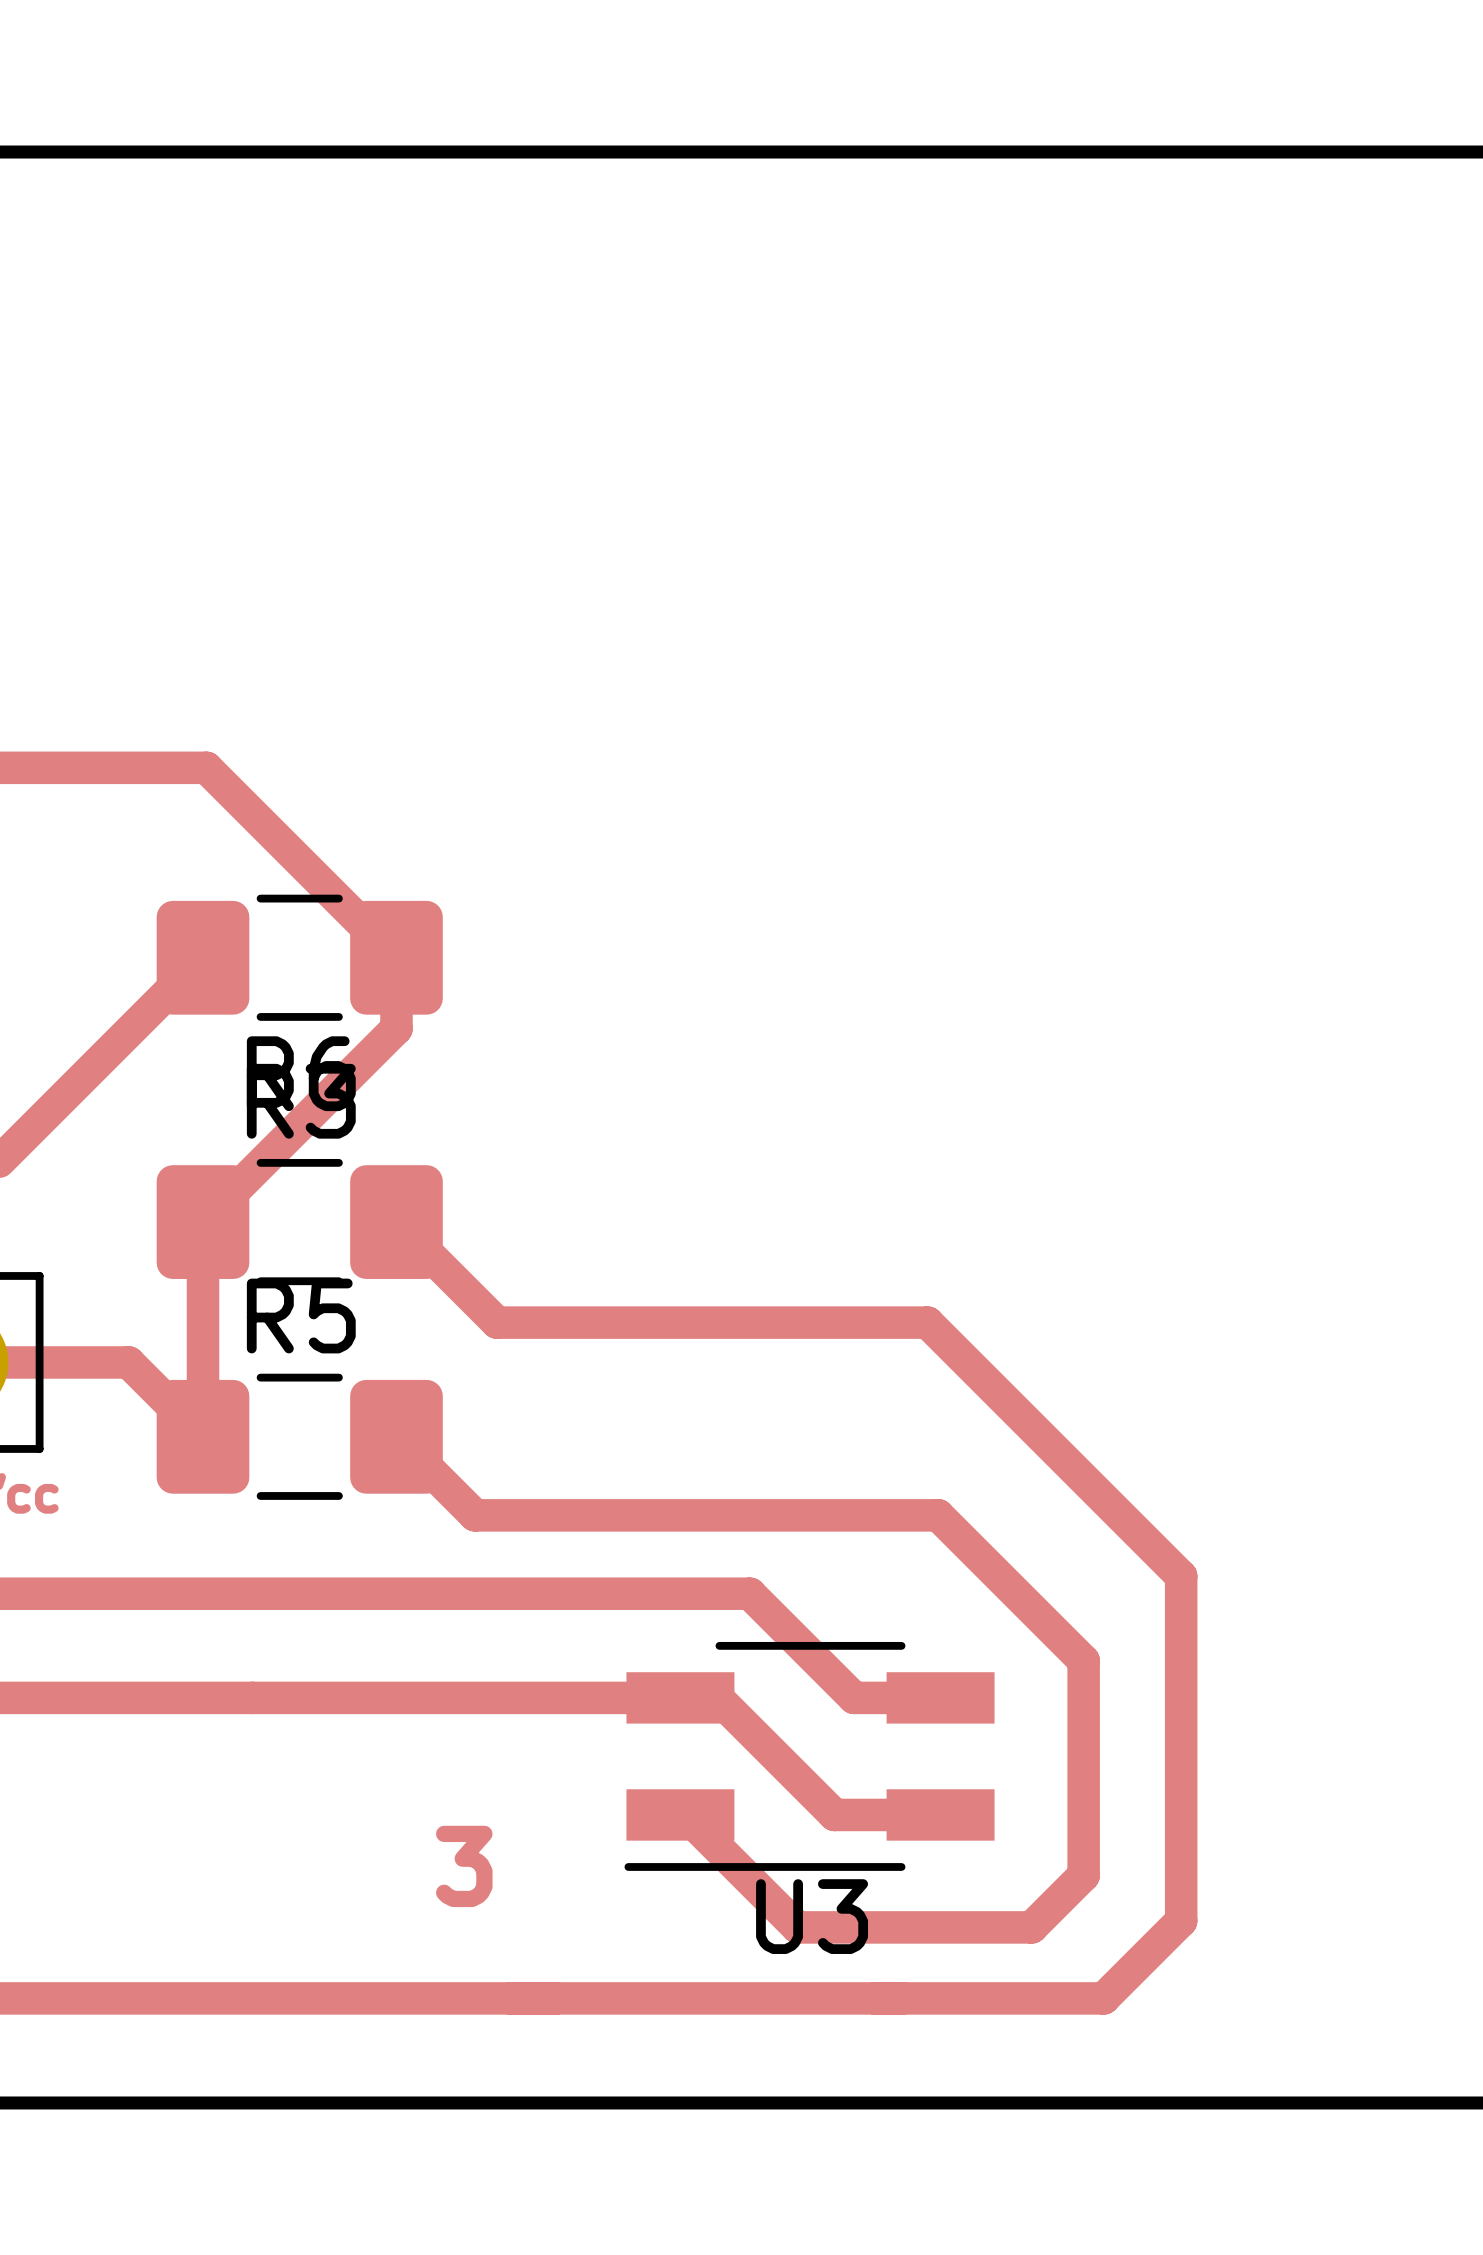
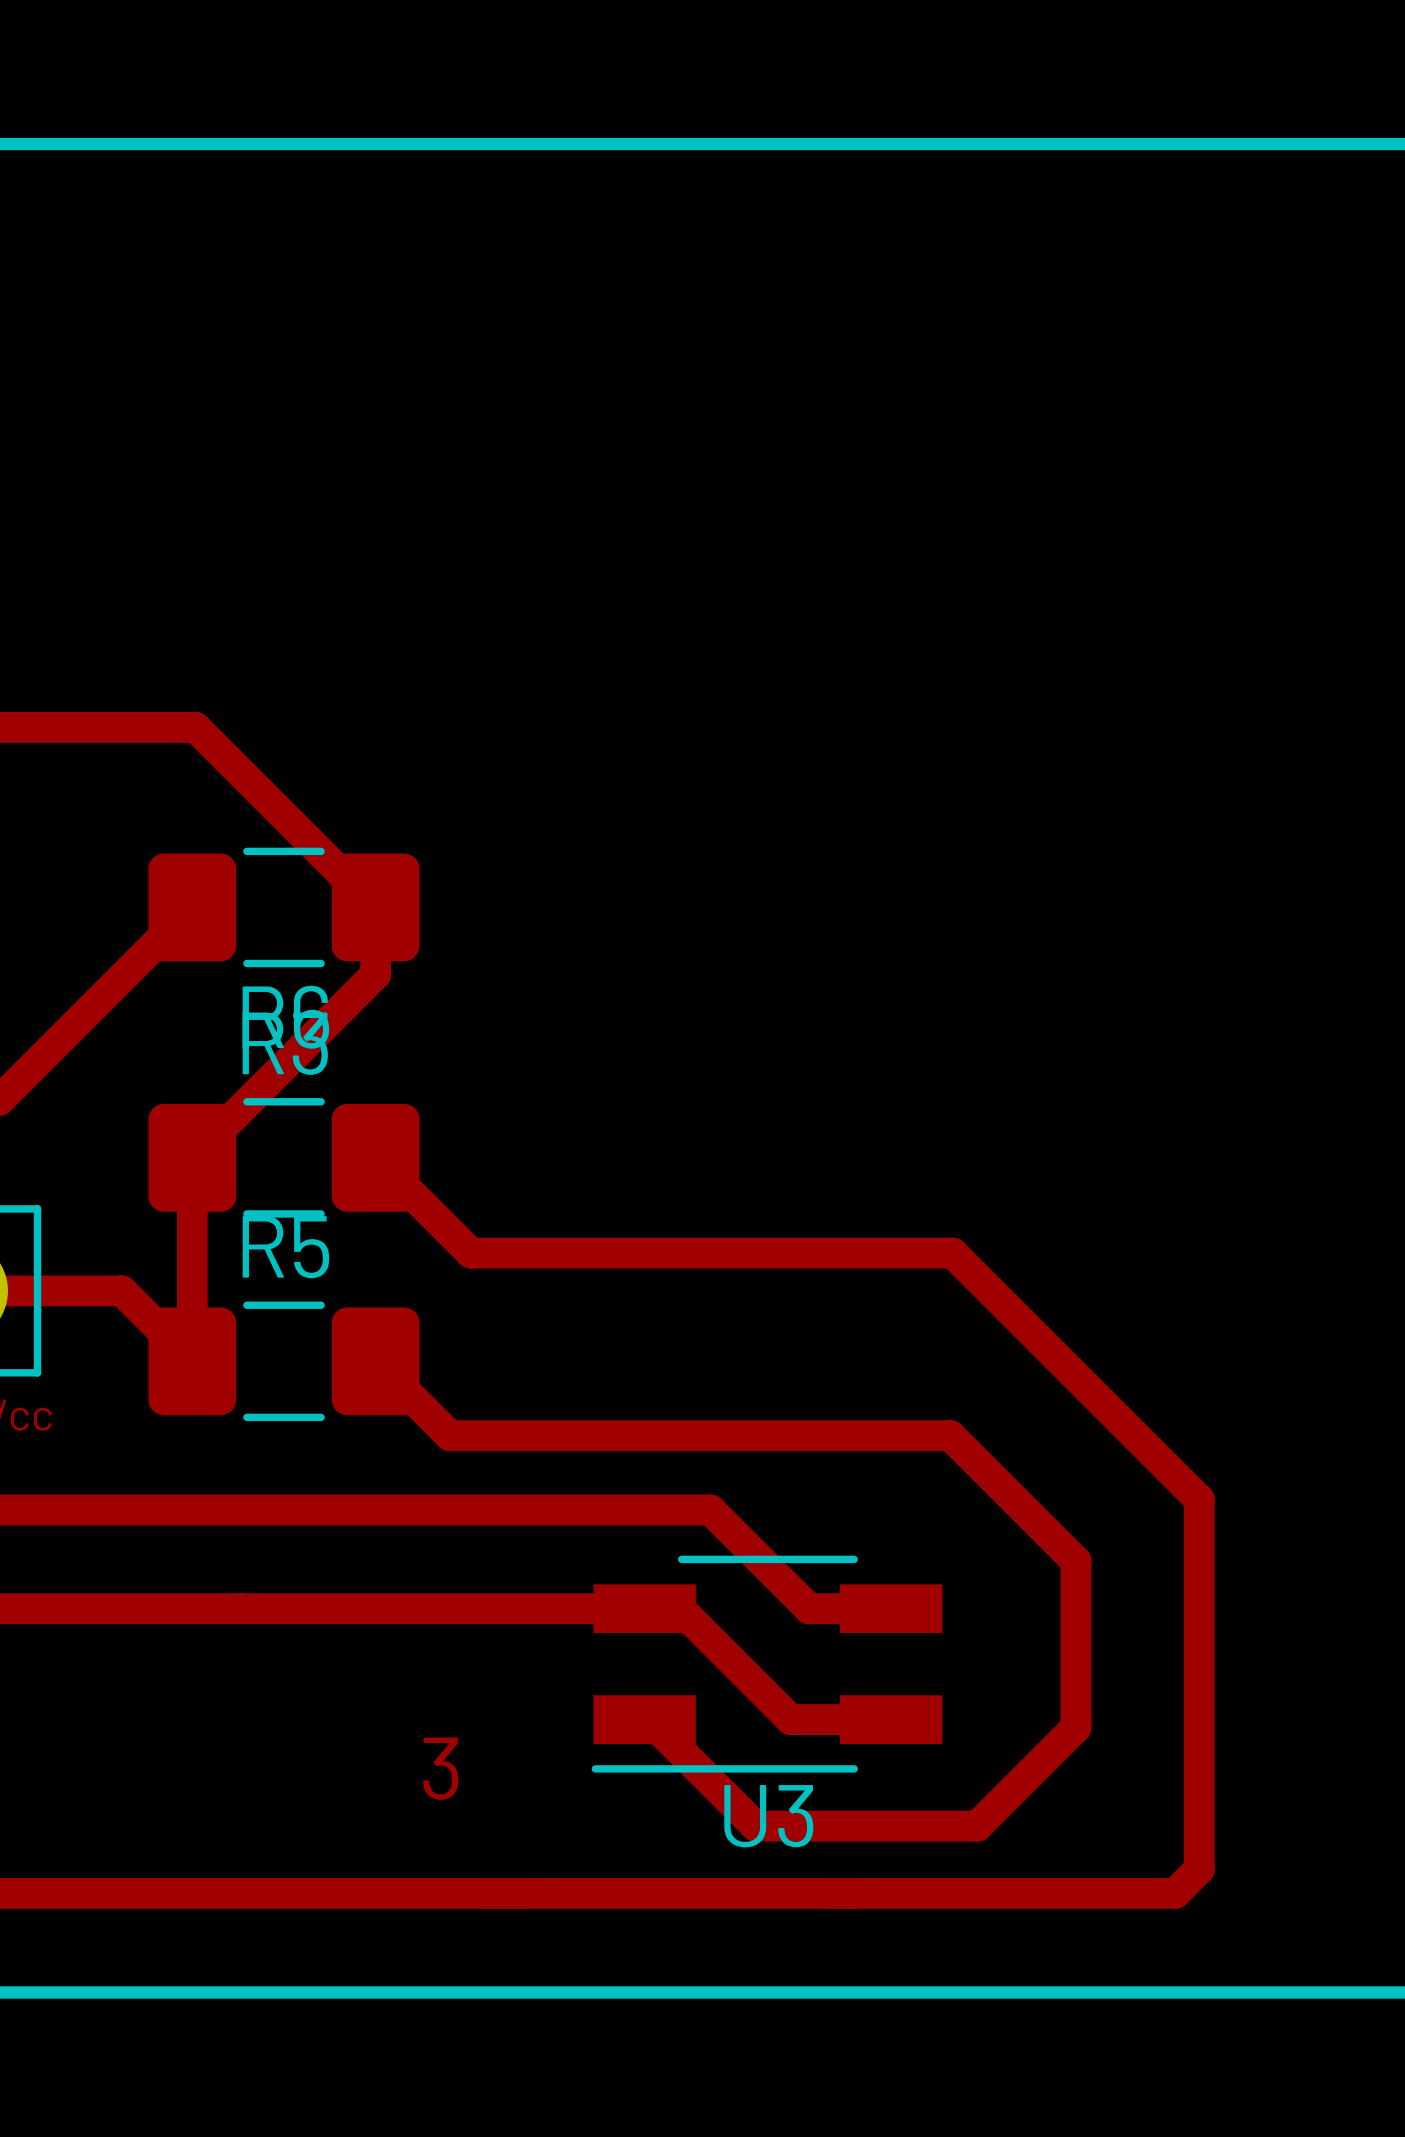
track: (927, 1322) (1181, 1576) (1181, 1920) (1103, 1998) -> (878, 1253) (952, 1253) (1199, 1499) (1199, 1869) (1175, 1893) (1045, 1893)
track: (938, 1515) (1083, 1660) (1083, 1875) -> (888, 1435) (950, 1435) (1075, 1561) (1075, 1727) (1026, 1776)

